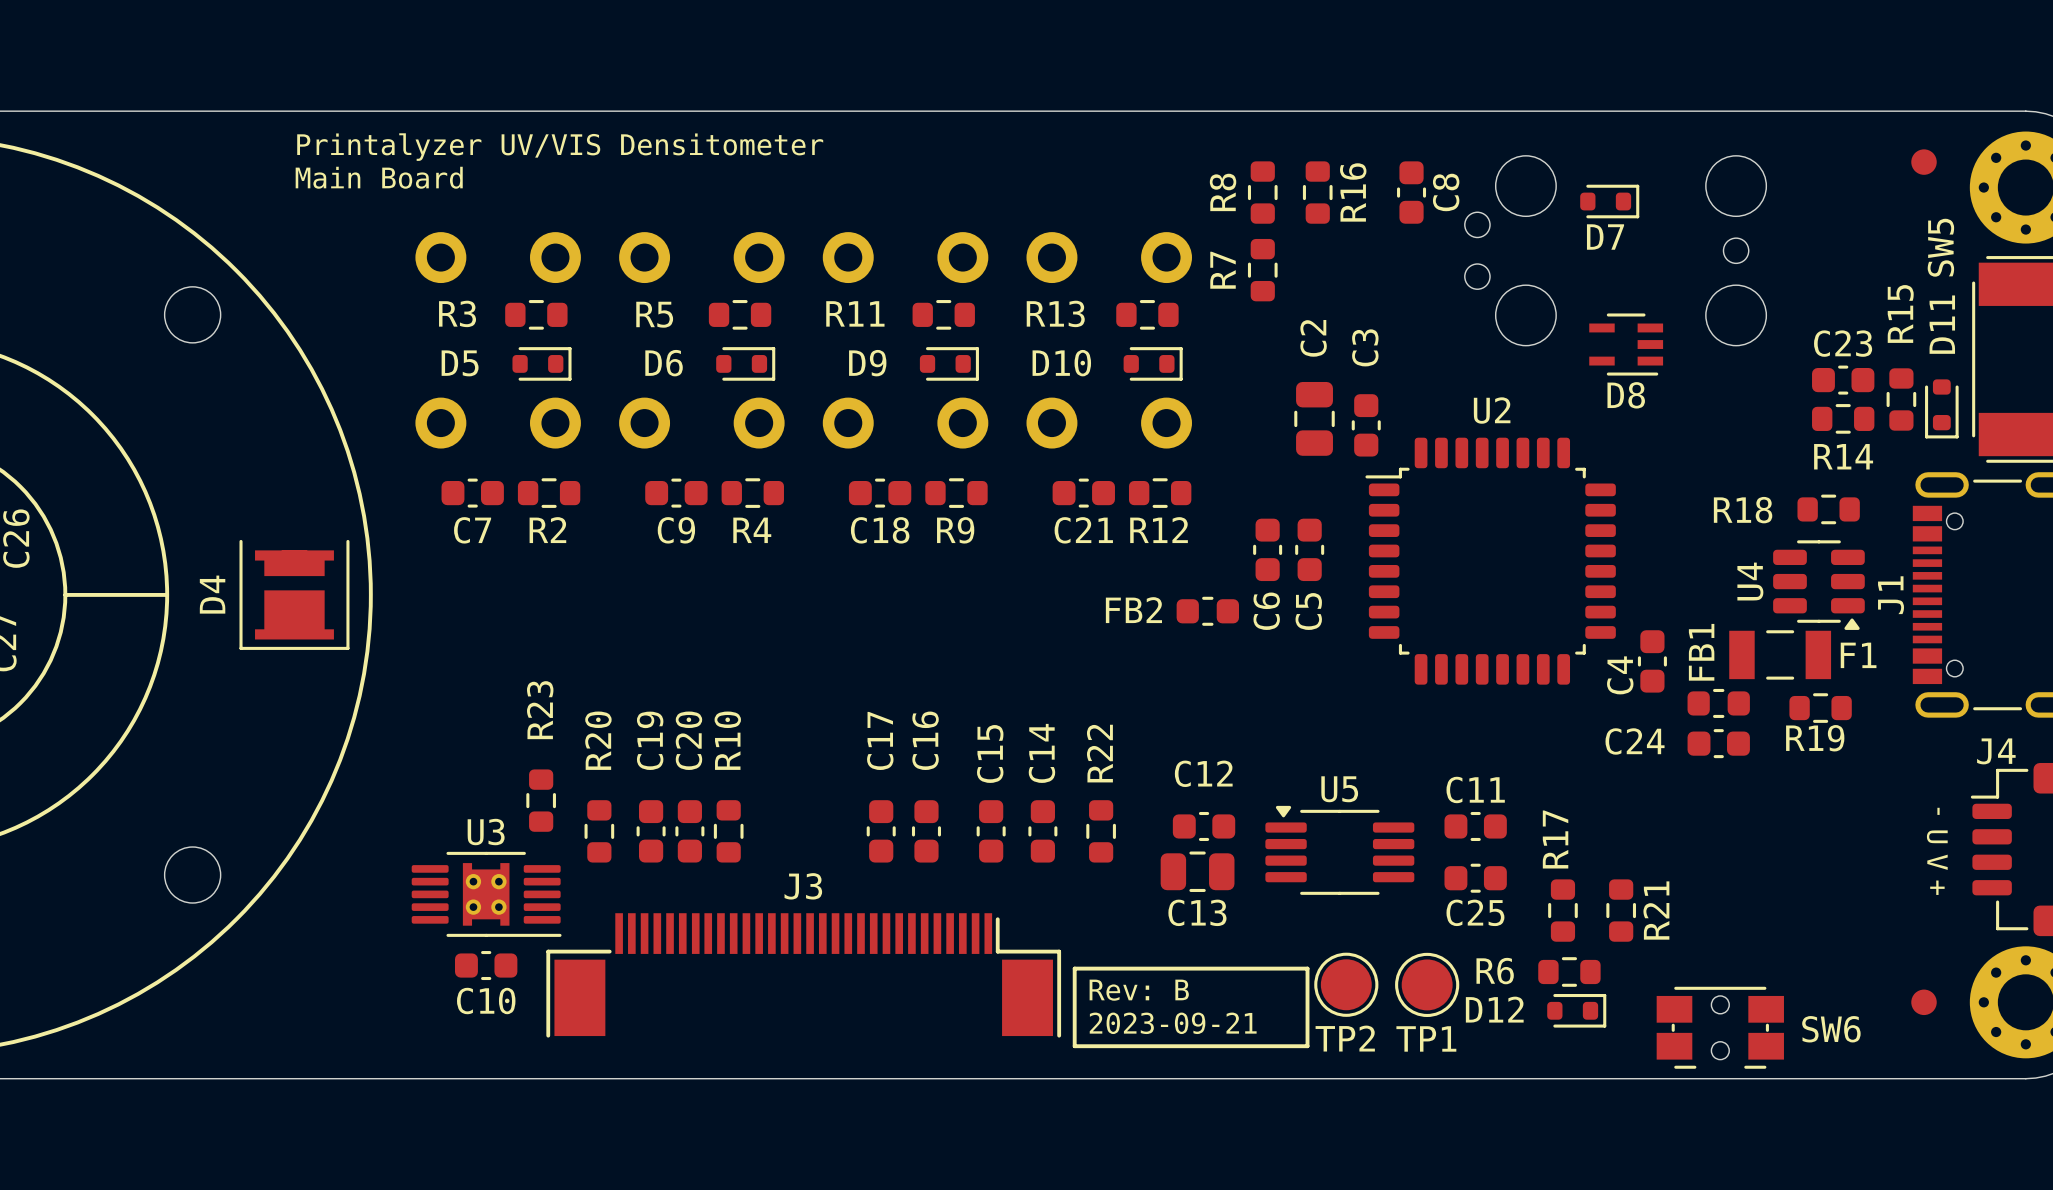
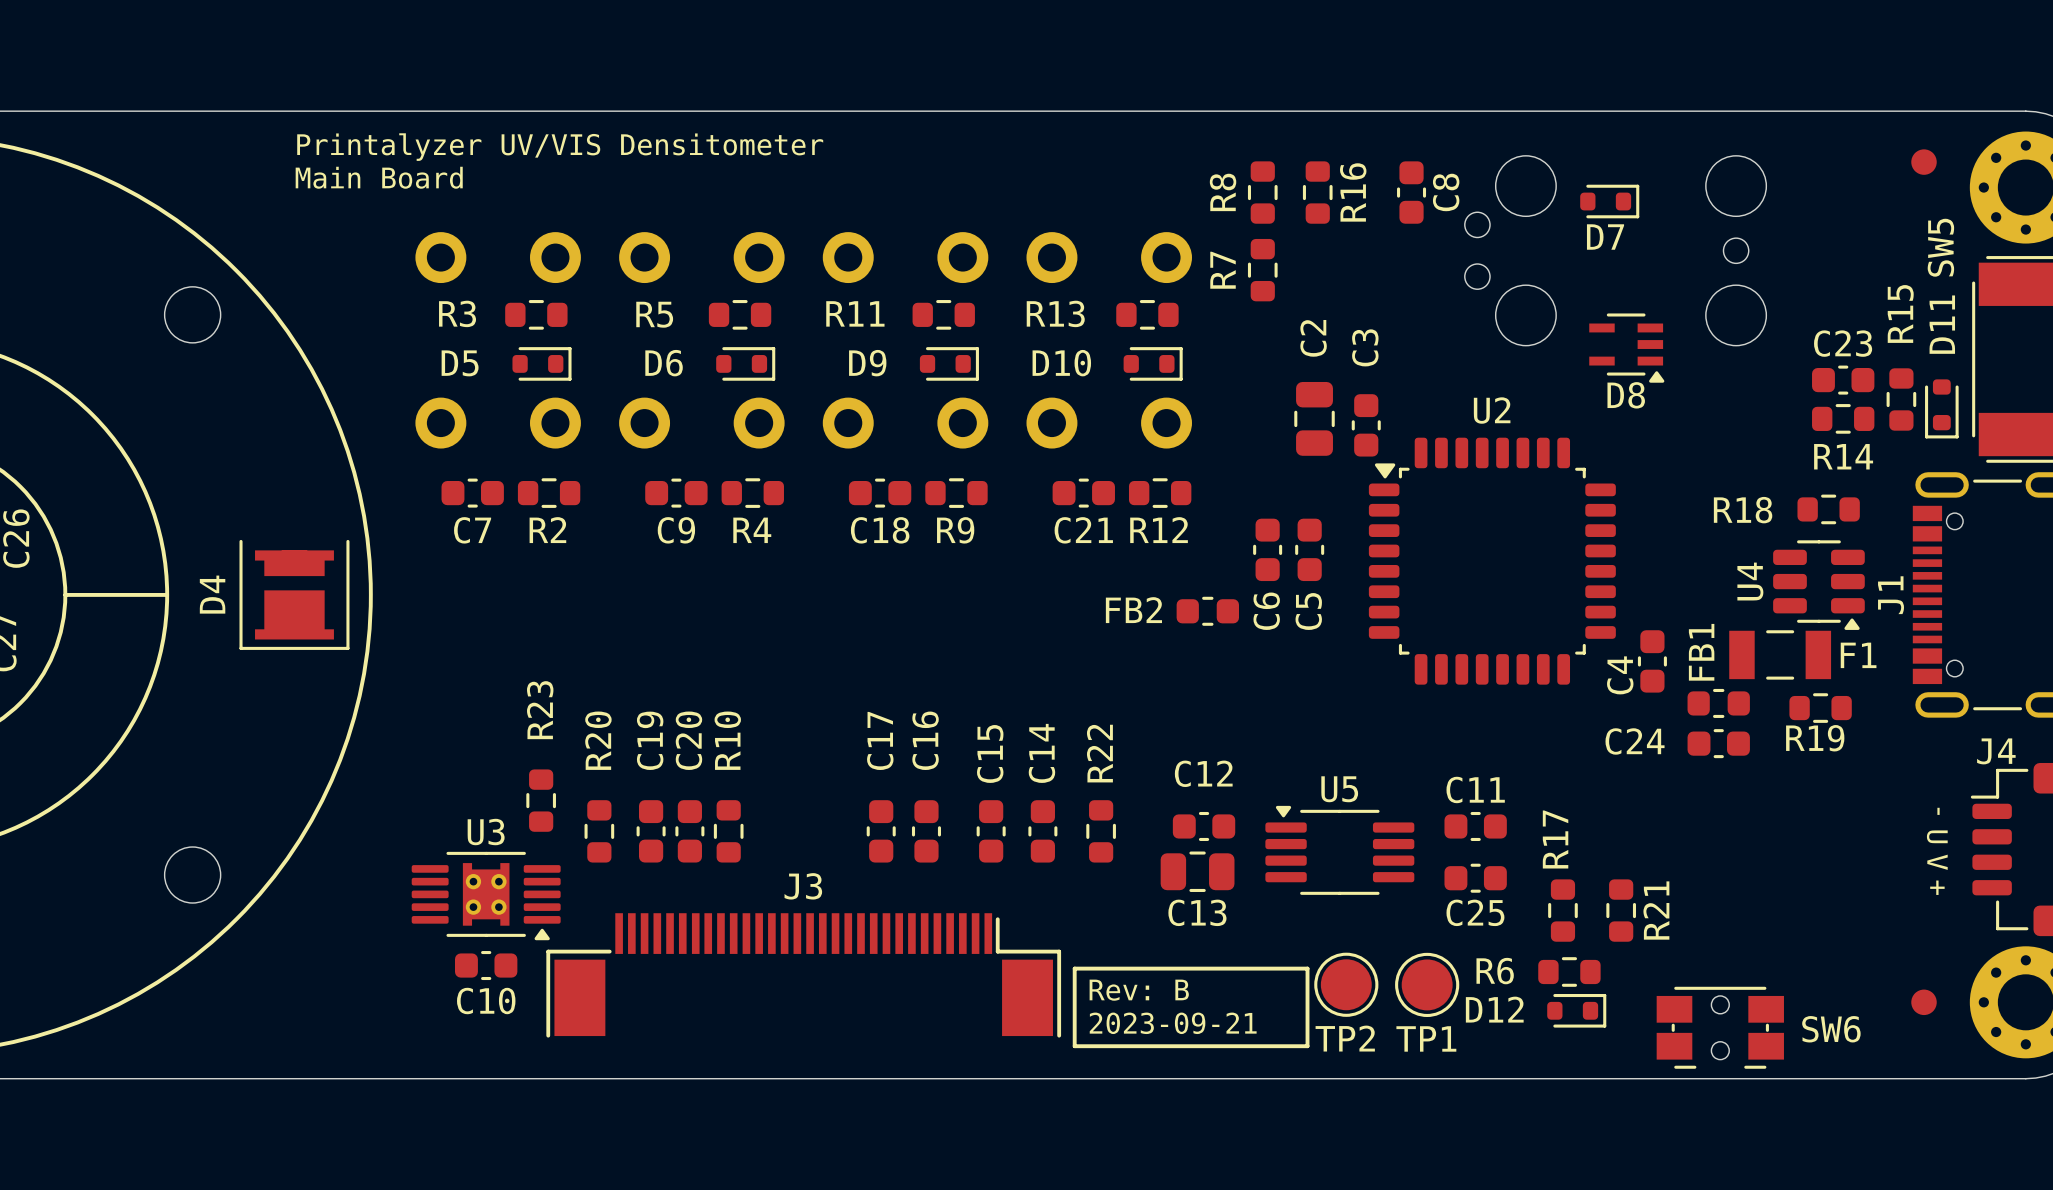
D8 footprint: [1589, 313, 1664, 376] -> [1589, 313, 1665, 383]
U2 footprint: [1365, 437, 1616, 685] -> [1368, 437, 1616, 685]
U3 footprint: [411, 851, 562, 937] -> [411, 851, 561, 941]

